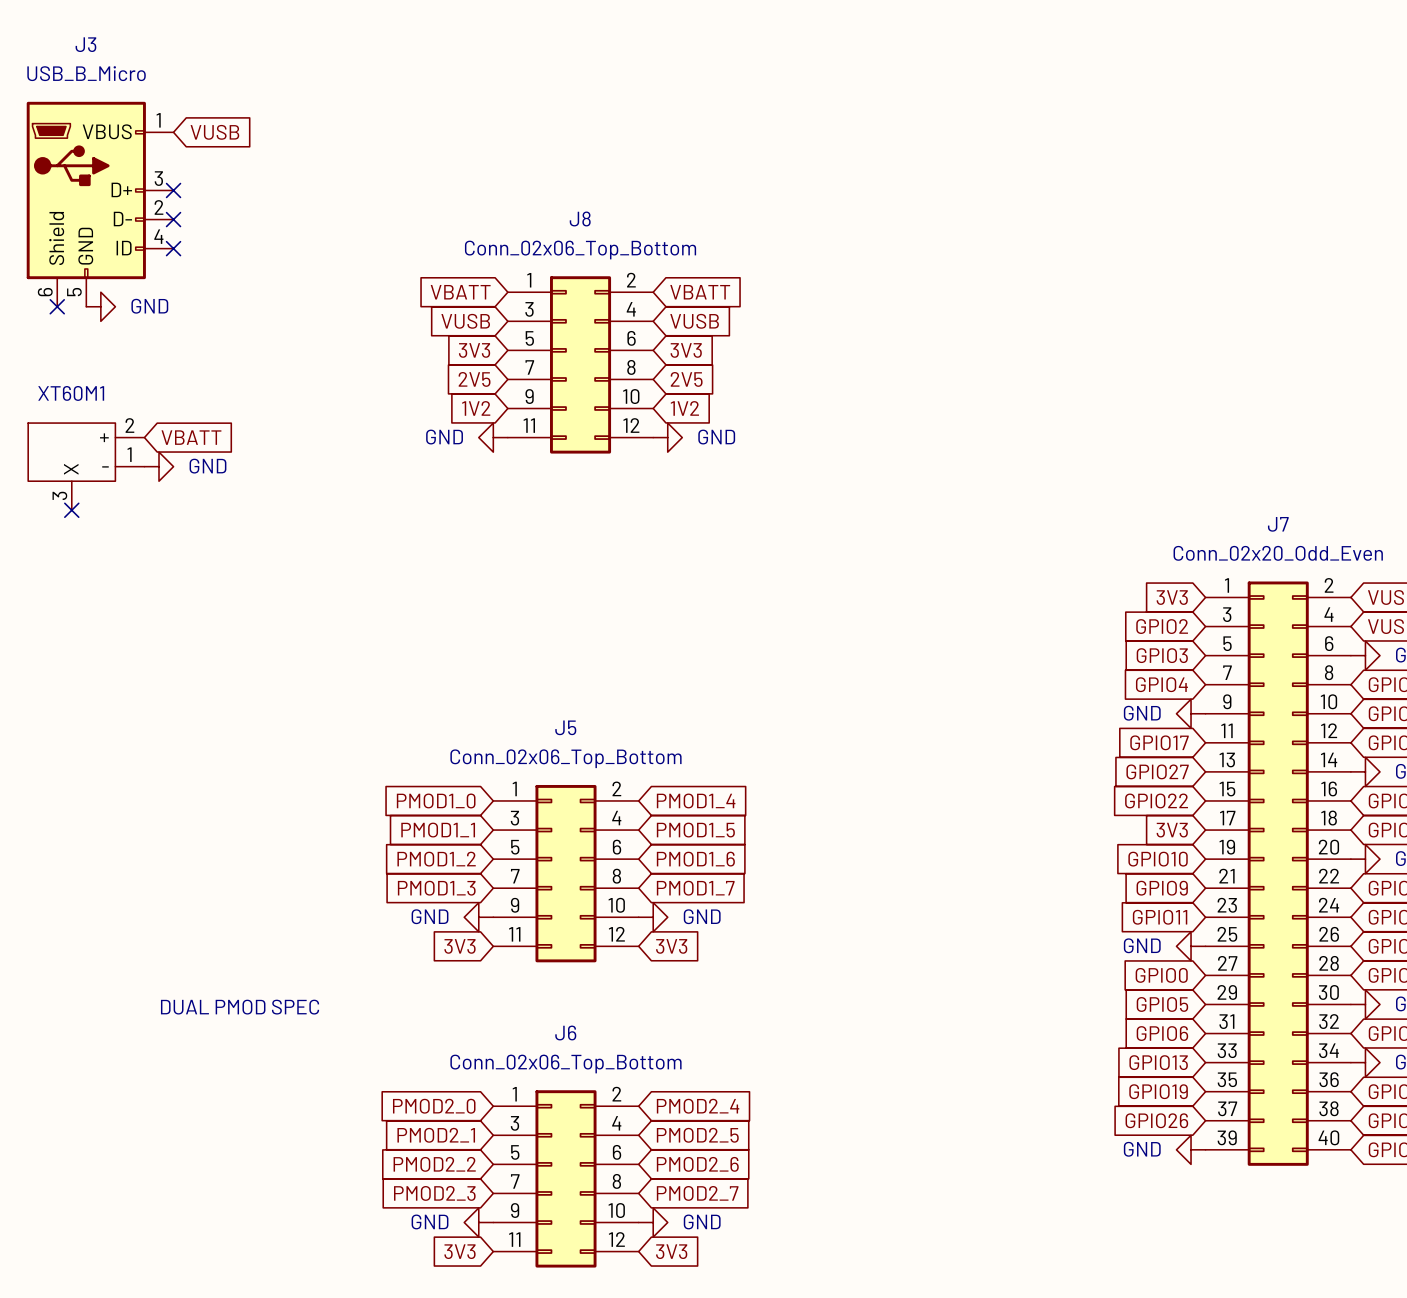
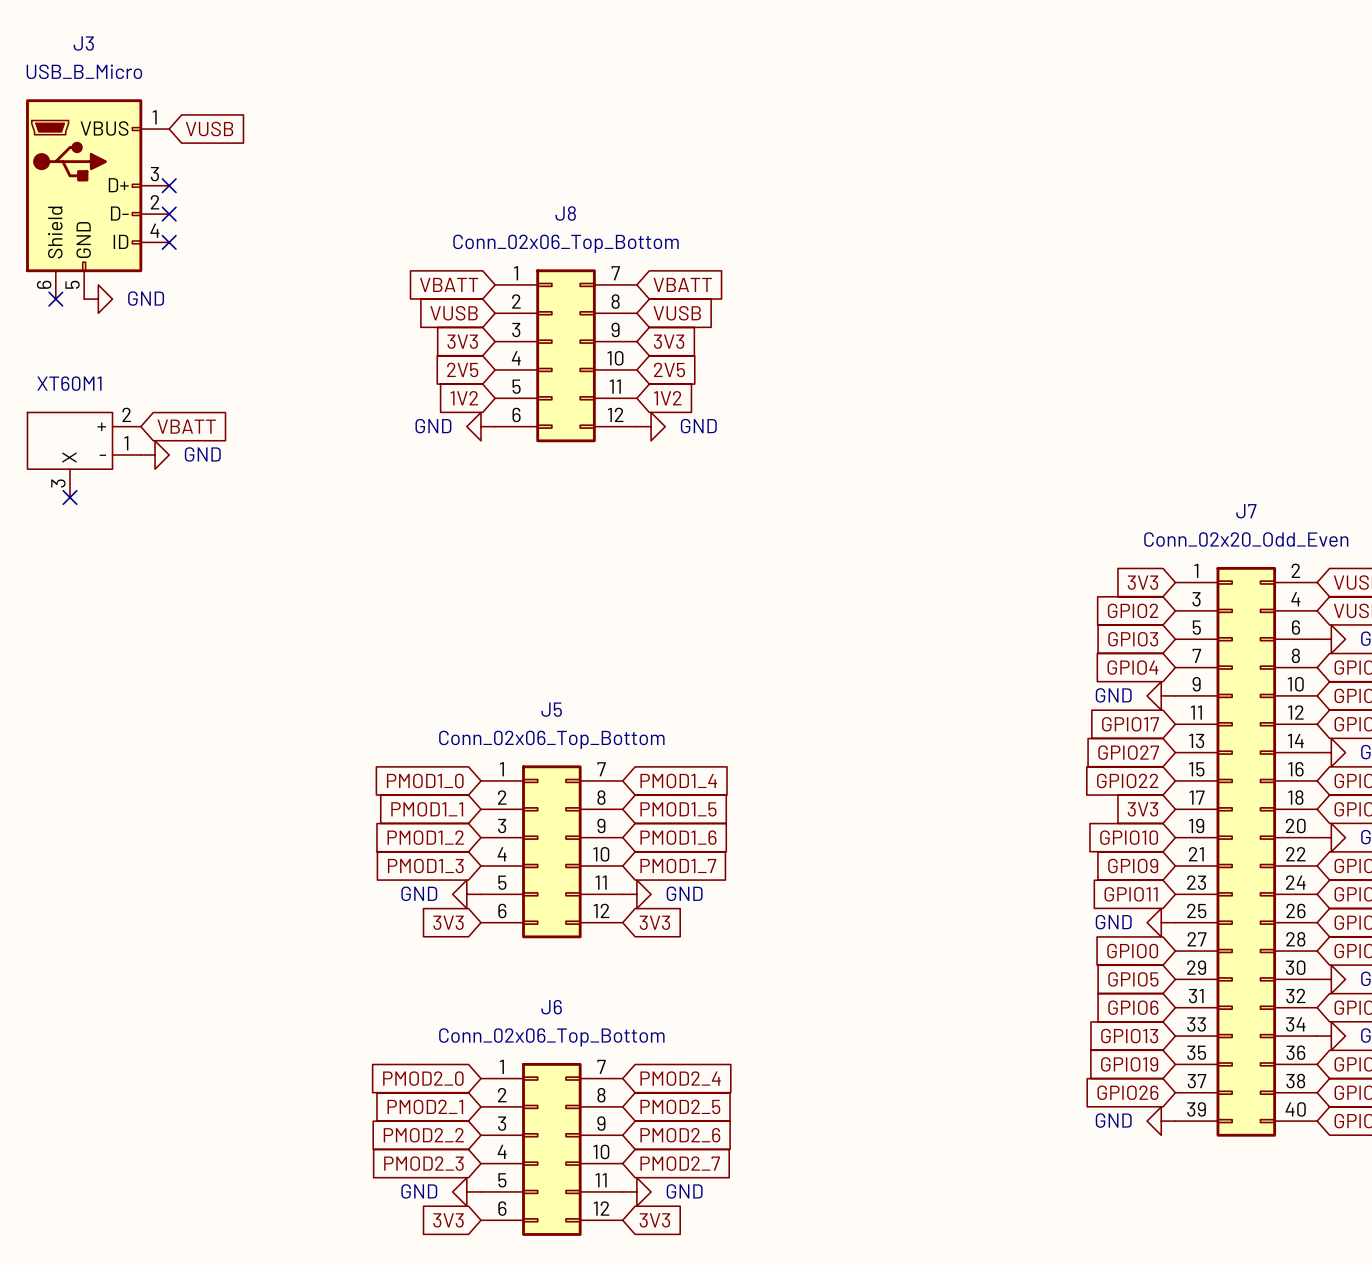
J8 symbol: [507, 276, 654, 454] -> [495, 269, 637, 443]
J5 symbol: [493, 784, 639, 963] -> [480, 765, 623, 939]
text: DUAL PMOD SPEC (240, 1007) -> none
J6 symbol: [493, 1090, 639, 1268] -> [480, 1062, 623, 1236]

